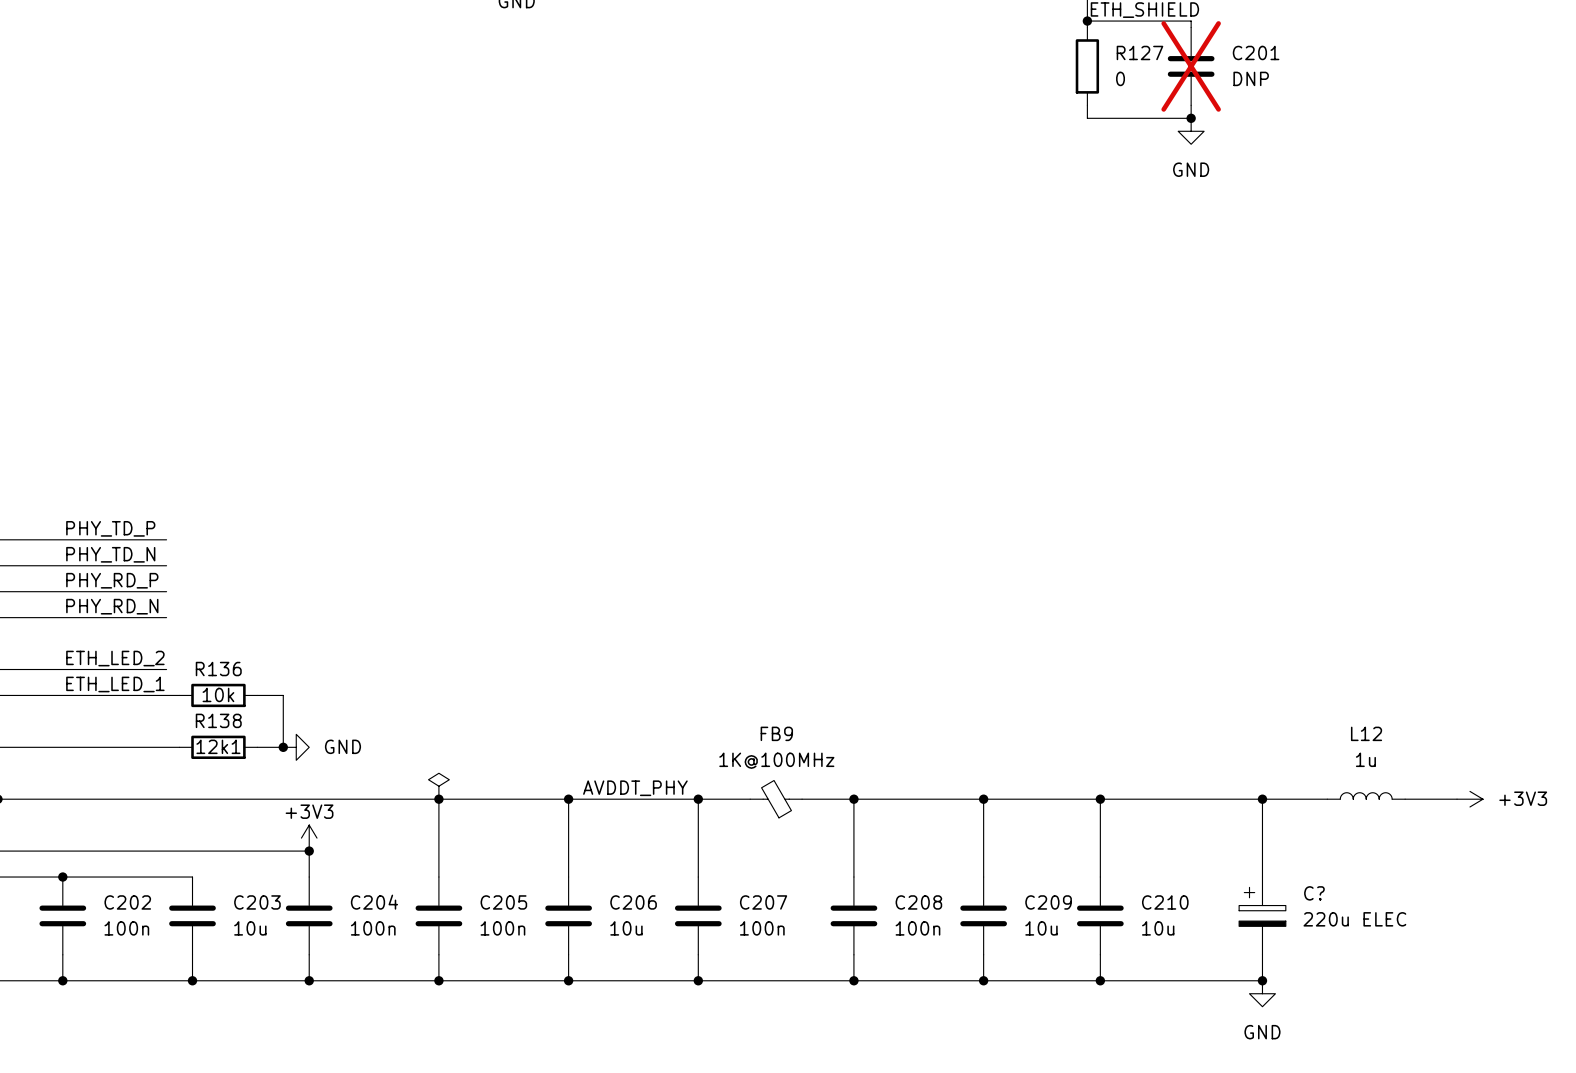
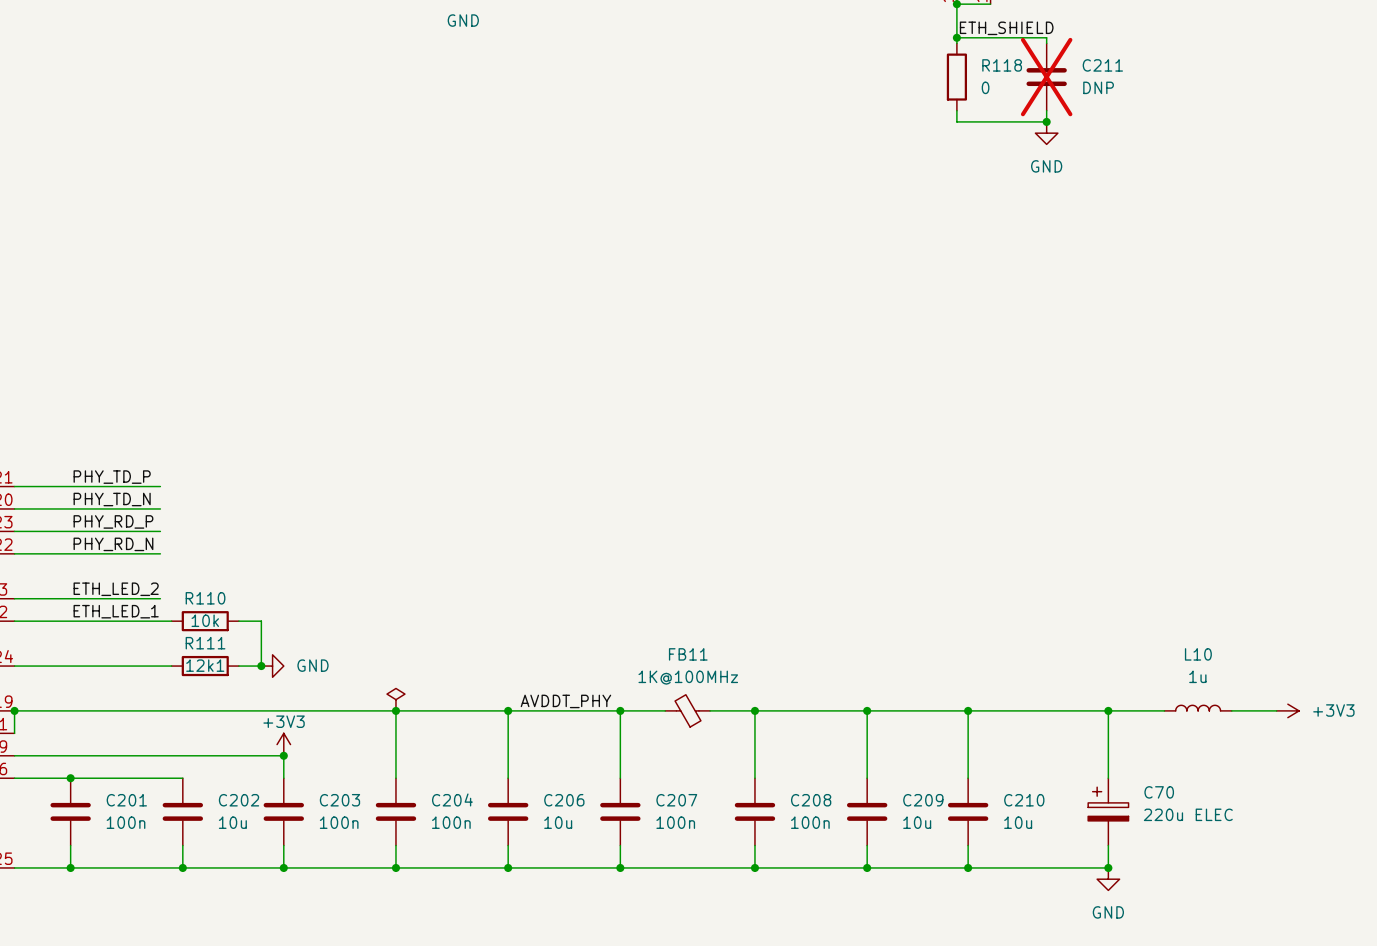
R127 name: R127 (1139, 52) -> R118 (1002, 65)
C201 name: C201 (1256, 52) -> C211 (1102, 65)
R136 name: R136 (218, 669) -> R110 (205, 598)
R138 name: R138 (218, 720) -> R111 (205, 643)
FB9 name: FB9 (776, 733) -> FB11 (688, 654)
L12 name: L12 (1366, 733) -> L10 (1198, 654)
C? name: C? (1314, 893) -> C70 (1159, 792)
C202 name: C202 (127, 902) -> C201 (126, 800)
C203 name: C203 (257, 902) -> C202 (239, 800)
C204 name: C204 (374, 902) -> C203 (339, 800)
C205 name: C205 (503, 902) -> C204 (452, 799)

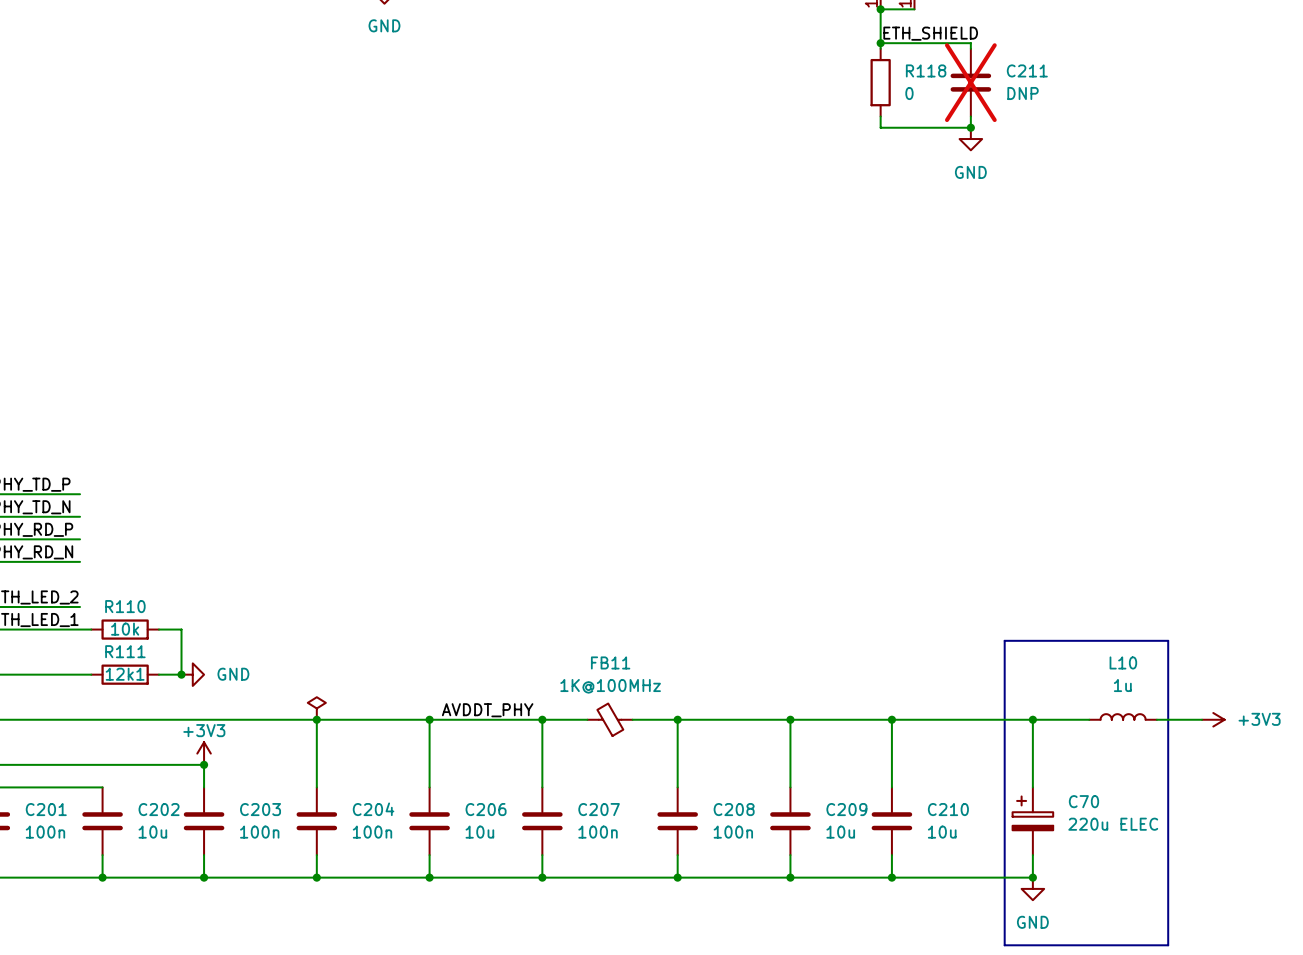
line: none -> (1004, 640) (1168, 640) (1168, 945) (1004, 945) (1004, 640)

